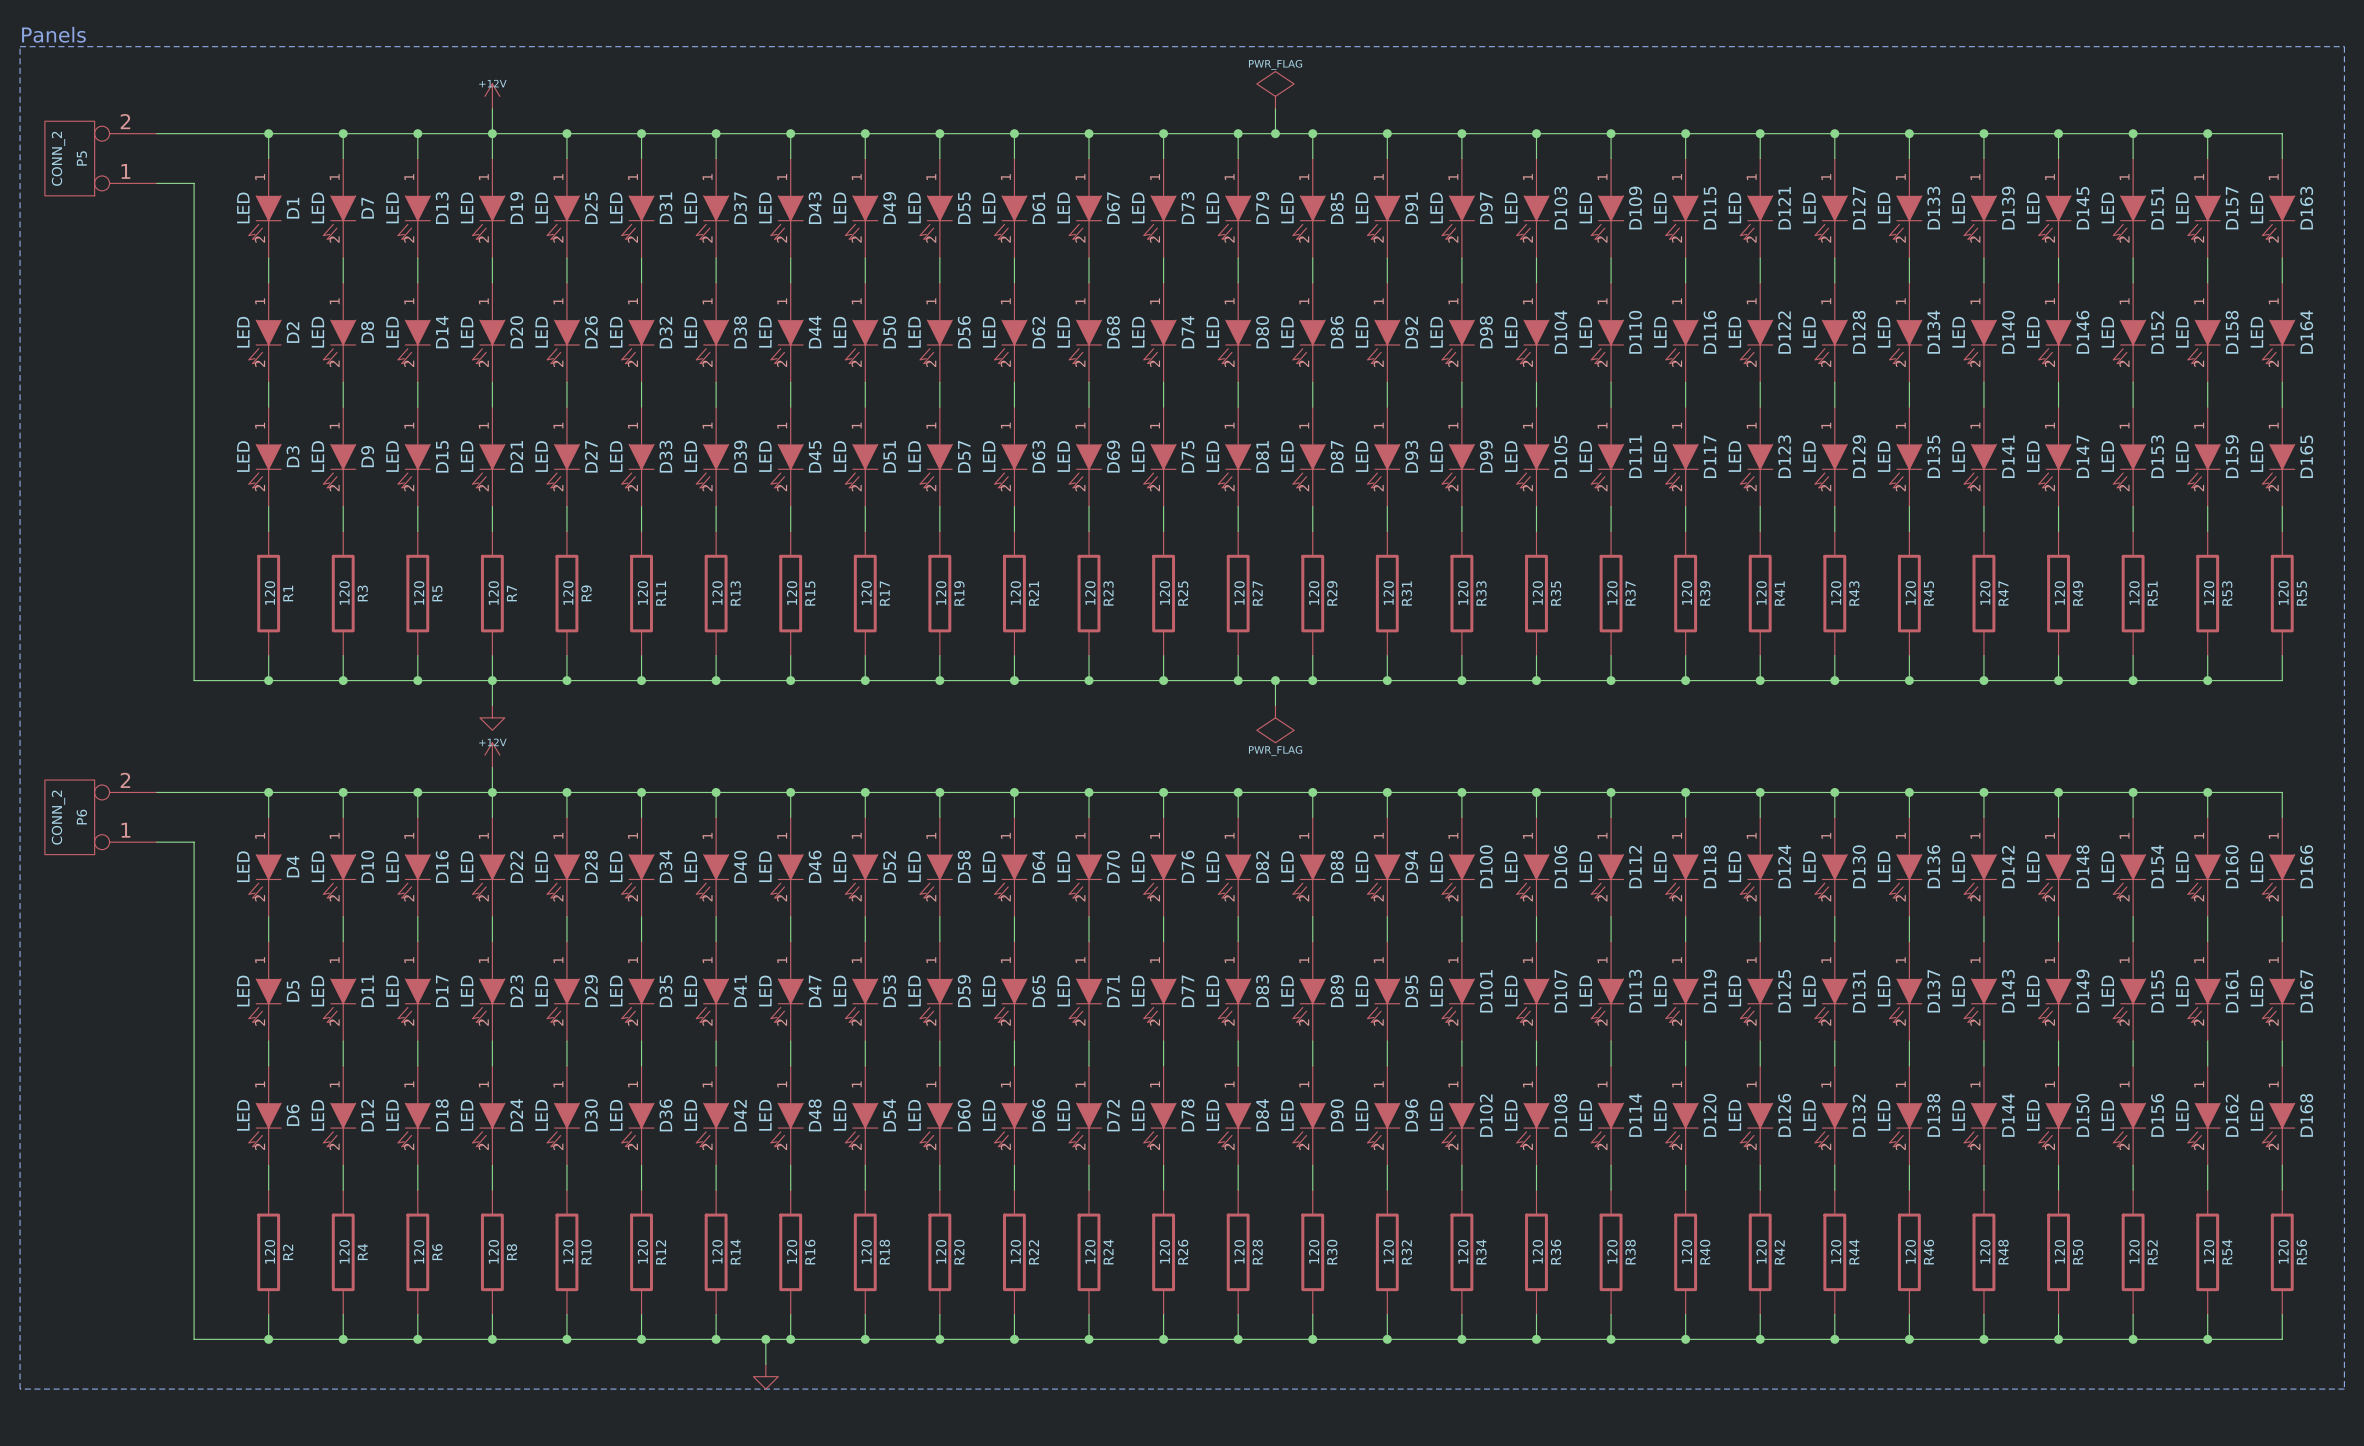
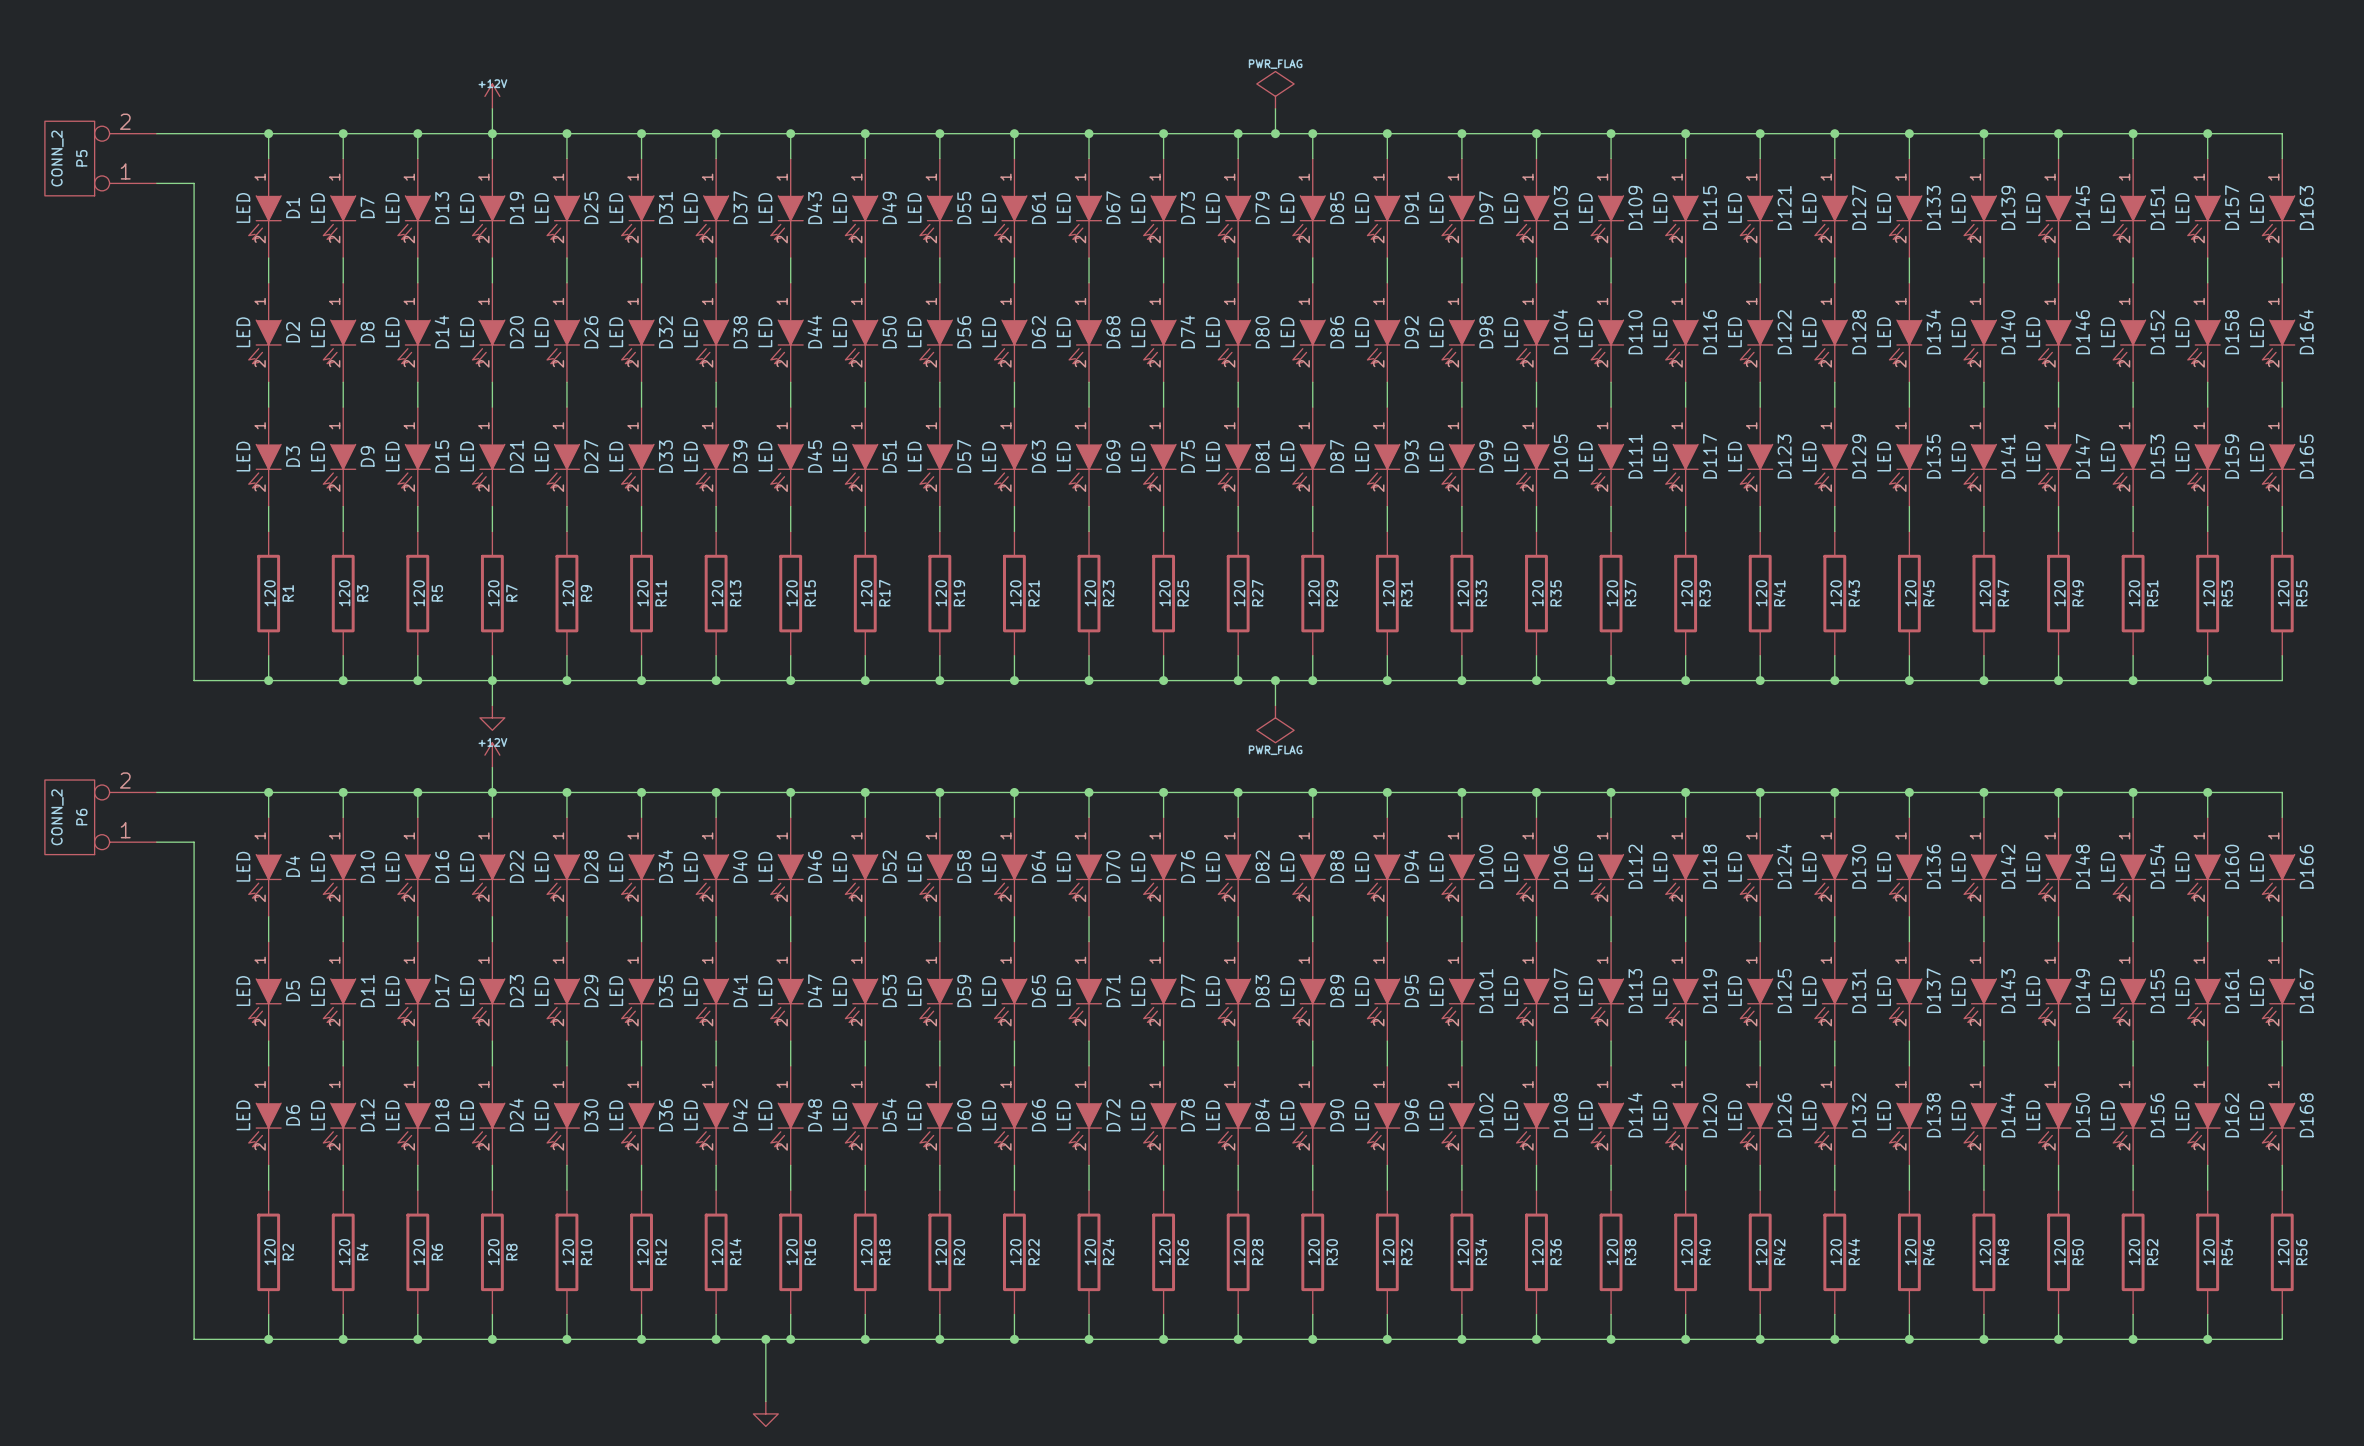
text: Panels (53, 34) -> none
line: (20, 46) (2344, 46) (2344, 1389) (20, 1389) (20, 46) -> none
wire: none -> (765, 1364) (765, 1401)
power symbol position: (765, 1376) -> (765, 1413)

